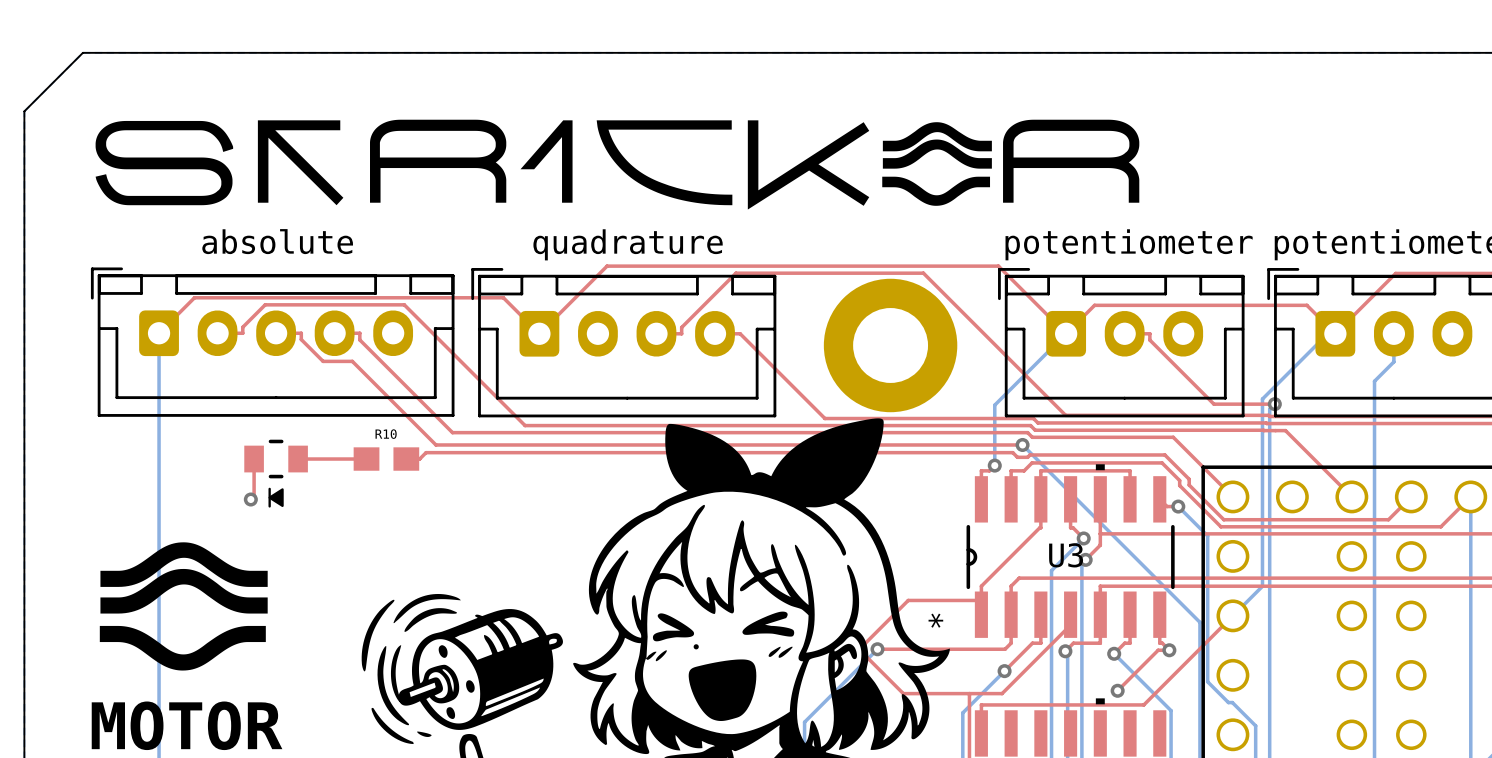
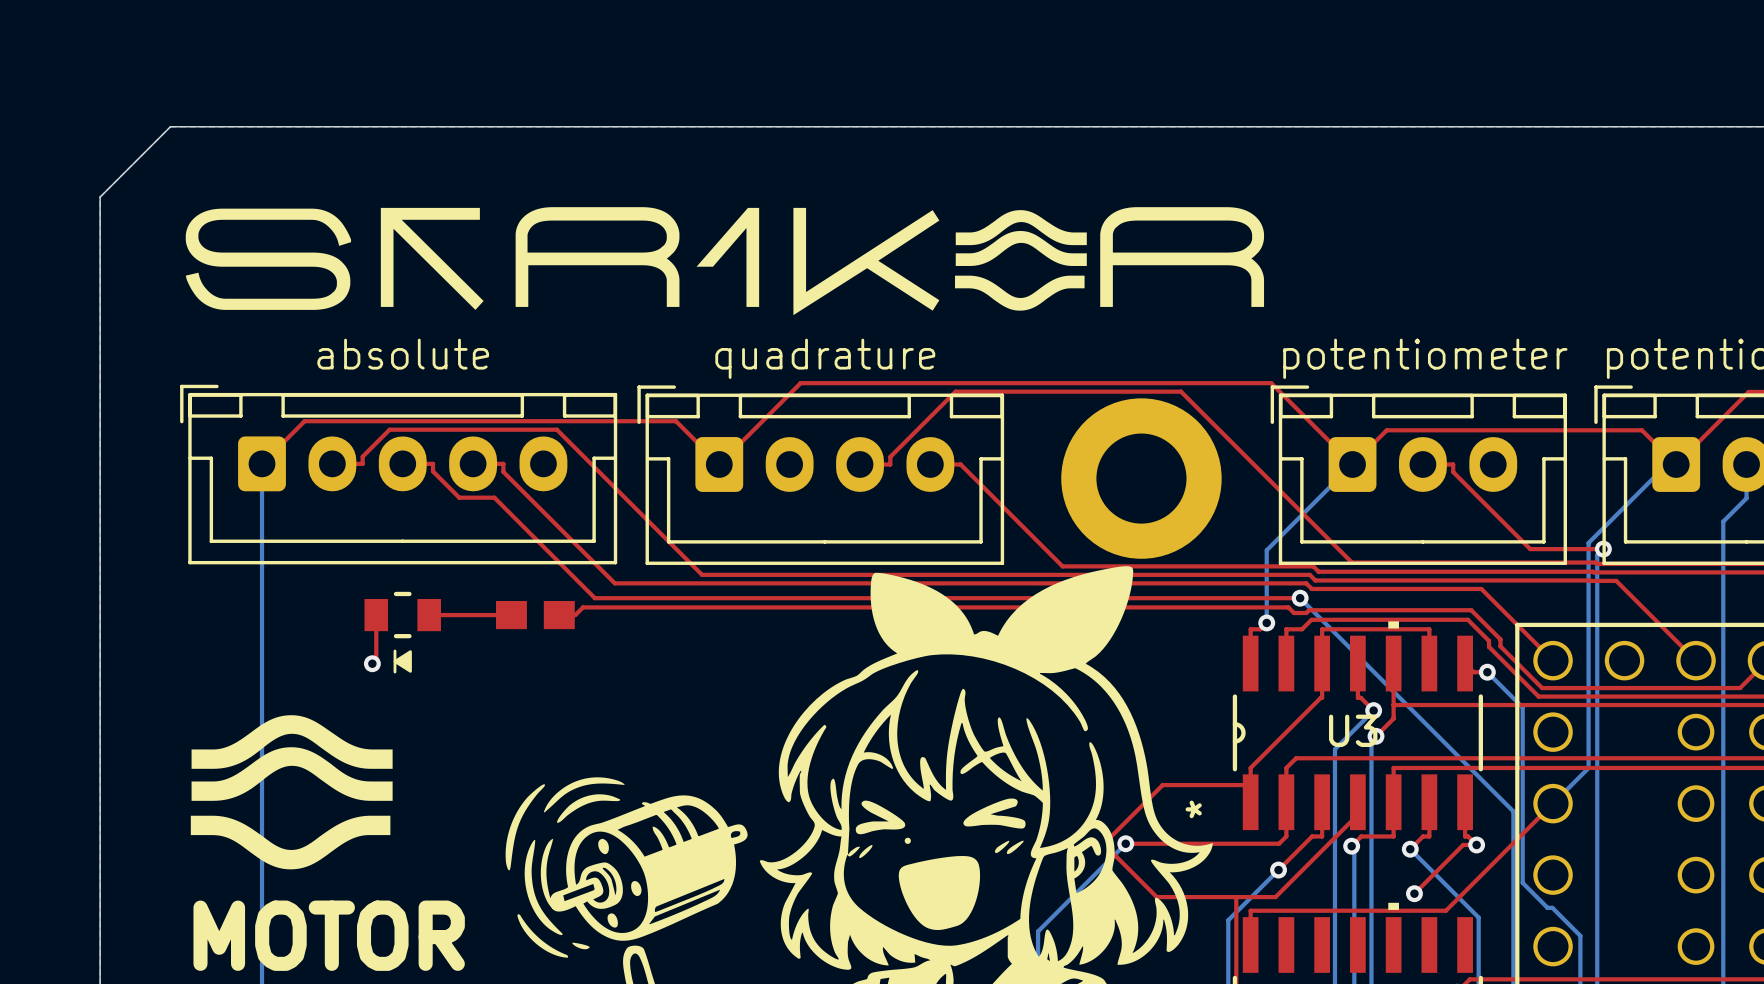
drawing: [596, 120, 733, 206] -> none
drawing position: (937, 136) -> (1021, 227)
drawing position: (937, 154) -> (1021, 248)
drawing position: (1071, 161) -> (1182, 257)
drawing position: (808, 164) -> (866, 261)
drawing position: (936, 191) -> (1019, 293)
R10 name: R10 (386, 434) -> none

